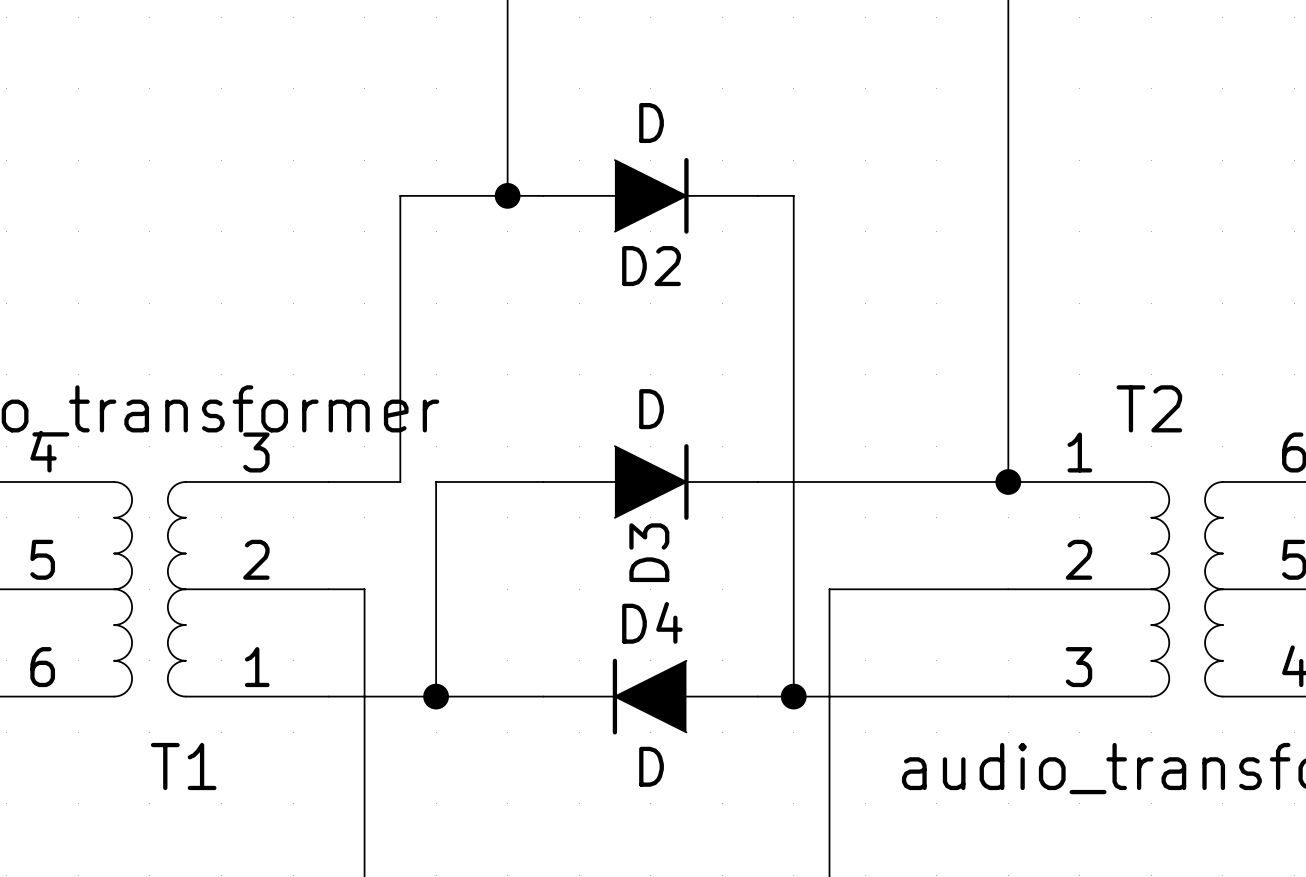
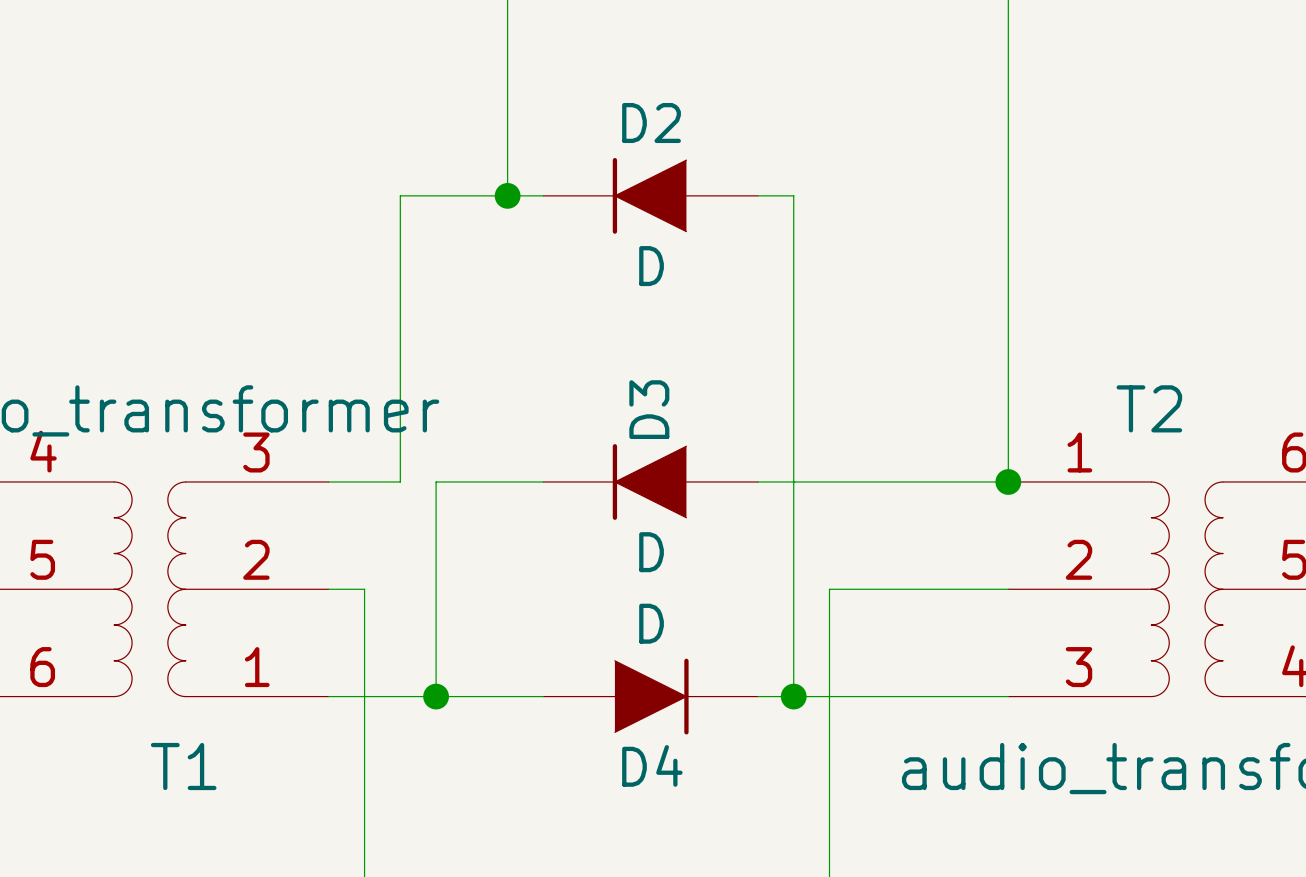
D2 rotation: 0° (651, 195) -> 180° (649, 195)
D3 rotation: 0° (651, 481) -> 180° (649, 481)
D4 rotation: 0° (649, 696) -> 180° (651, 696)

